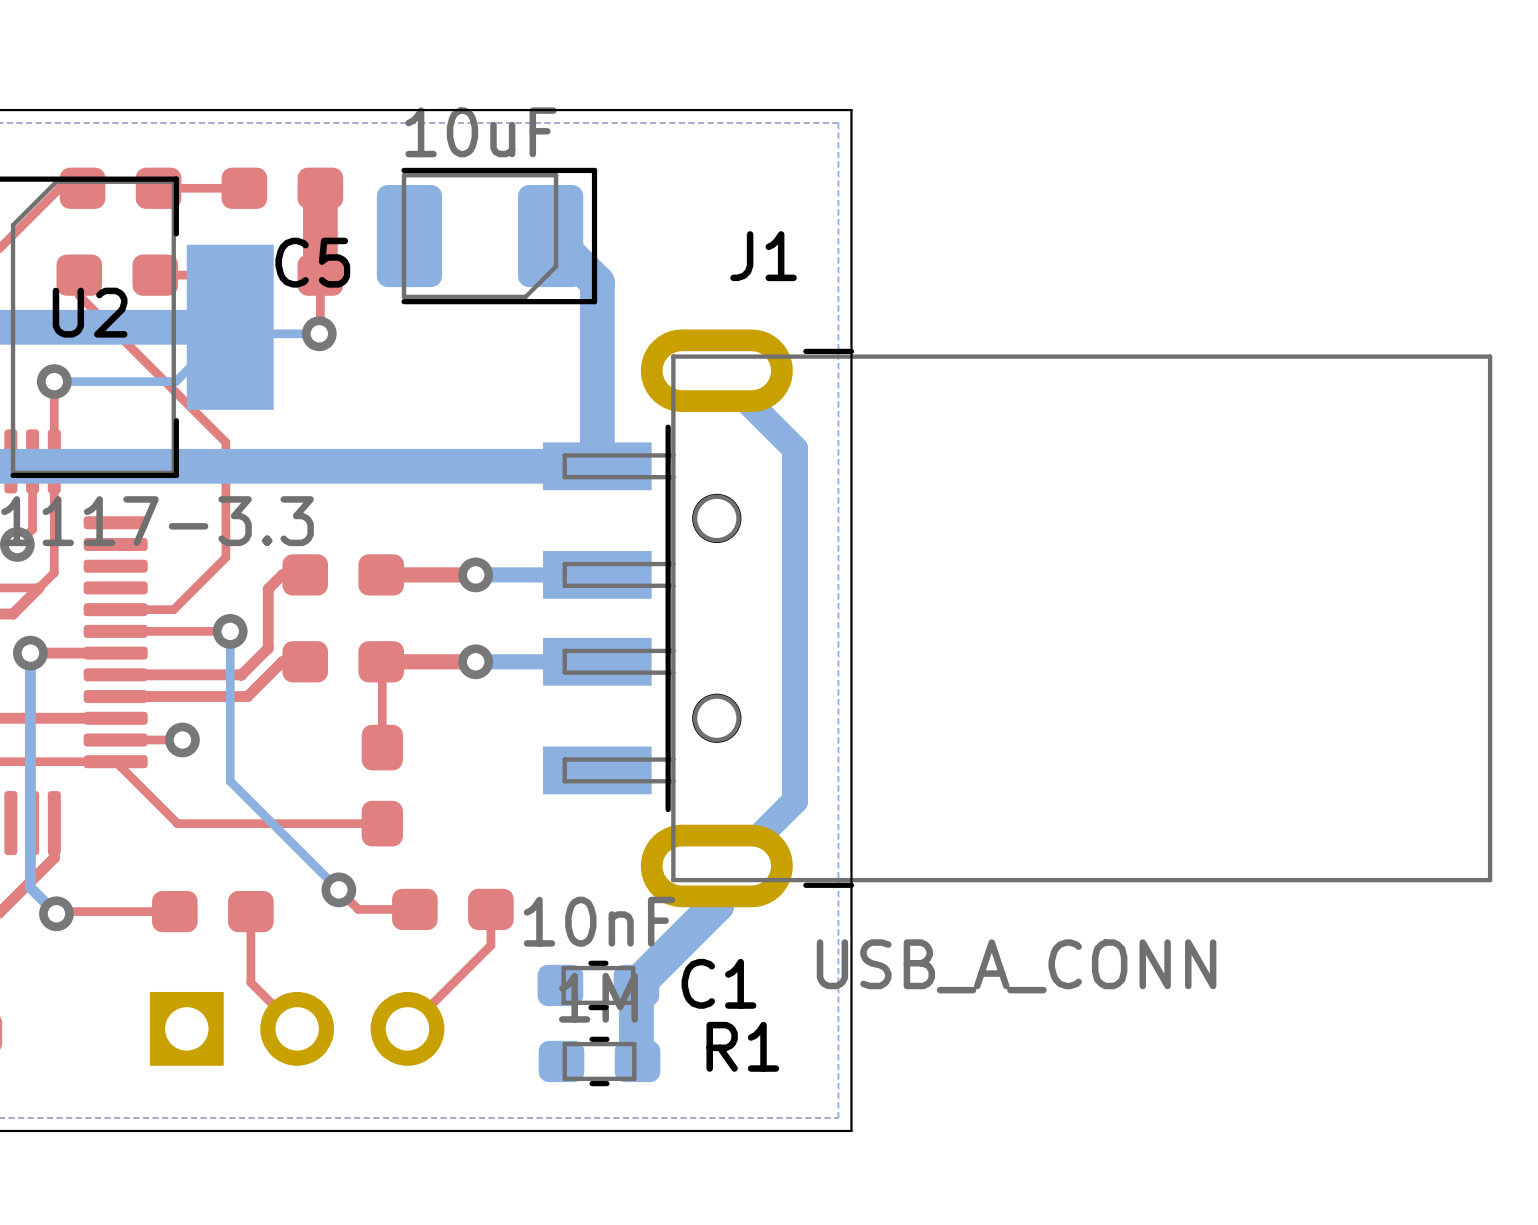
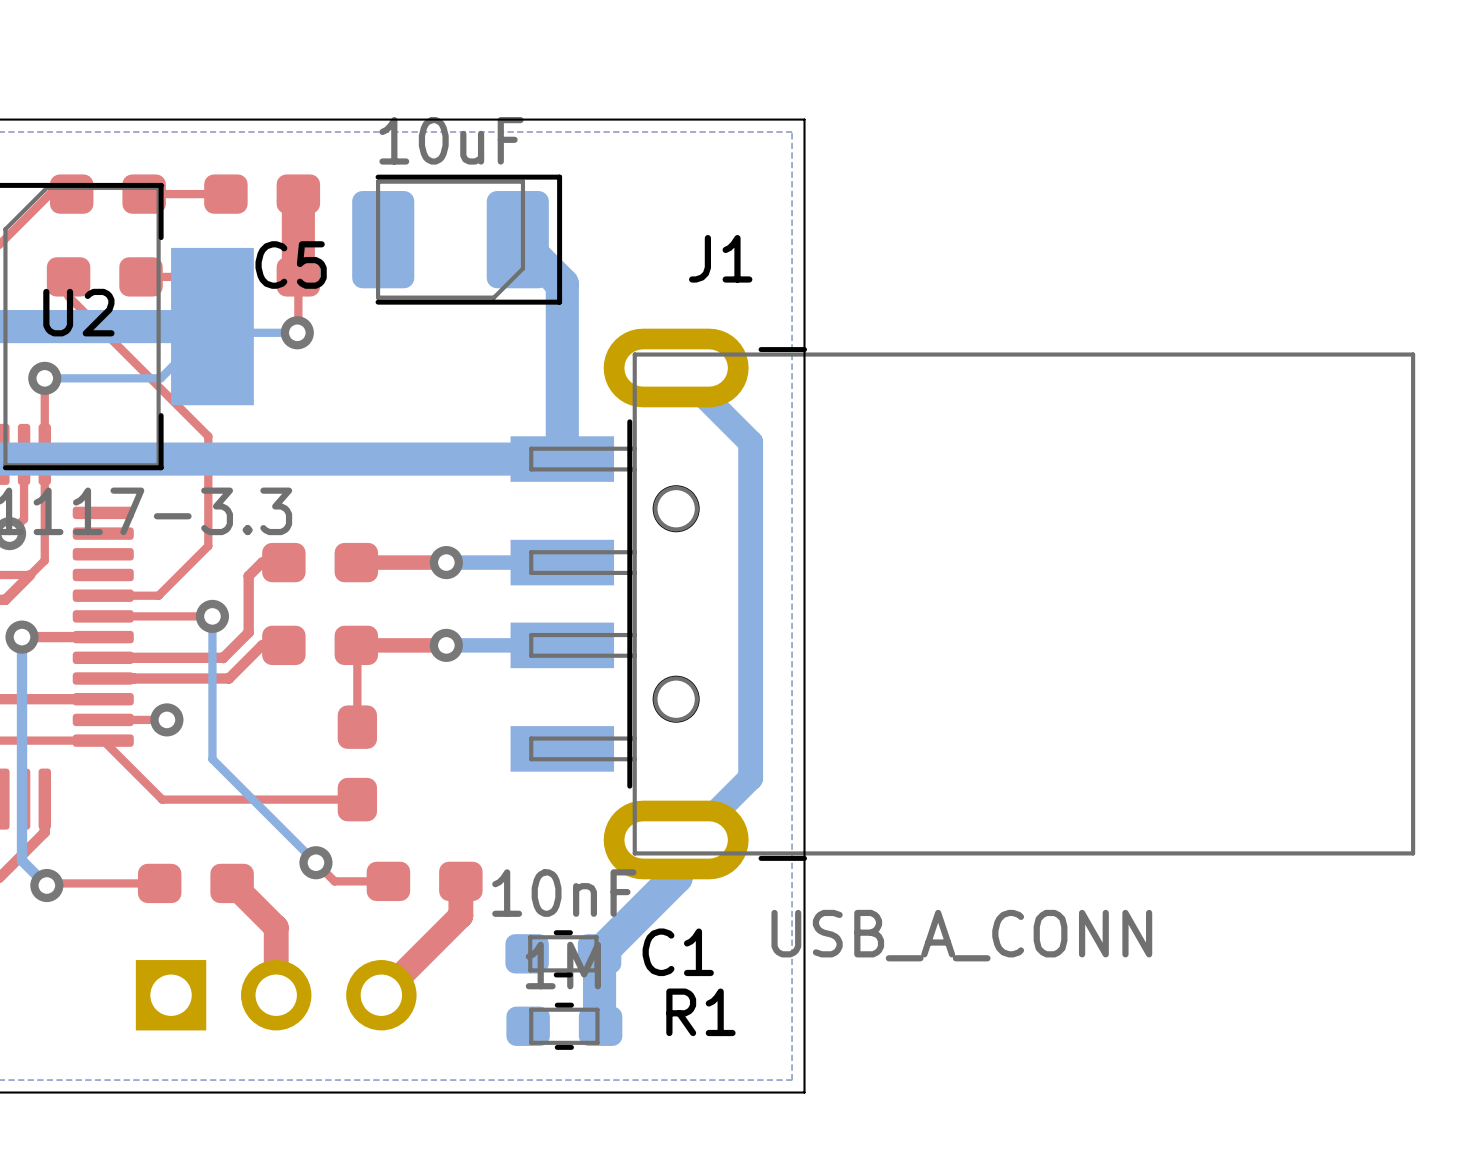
top track width: thin (490, 909) (490, 945) (407, 1028) -> thick (460, 881) (460, 915) (381, 995)
top track: (250, 911) (250, 982) (297, 1028) -> (232, 883) (276, 927) (276, 995)

